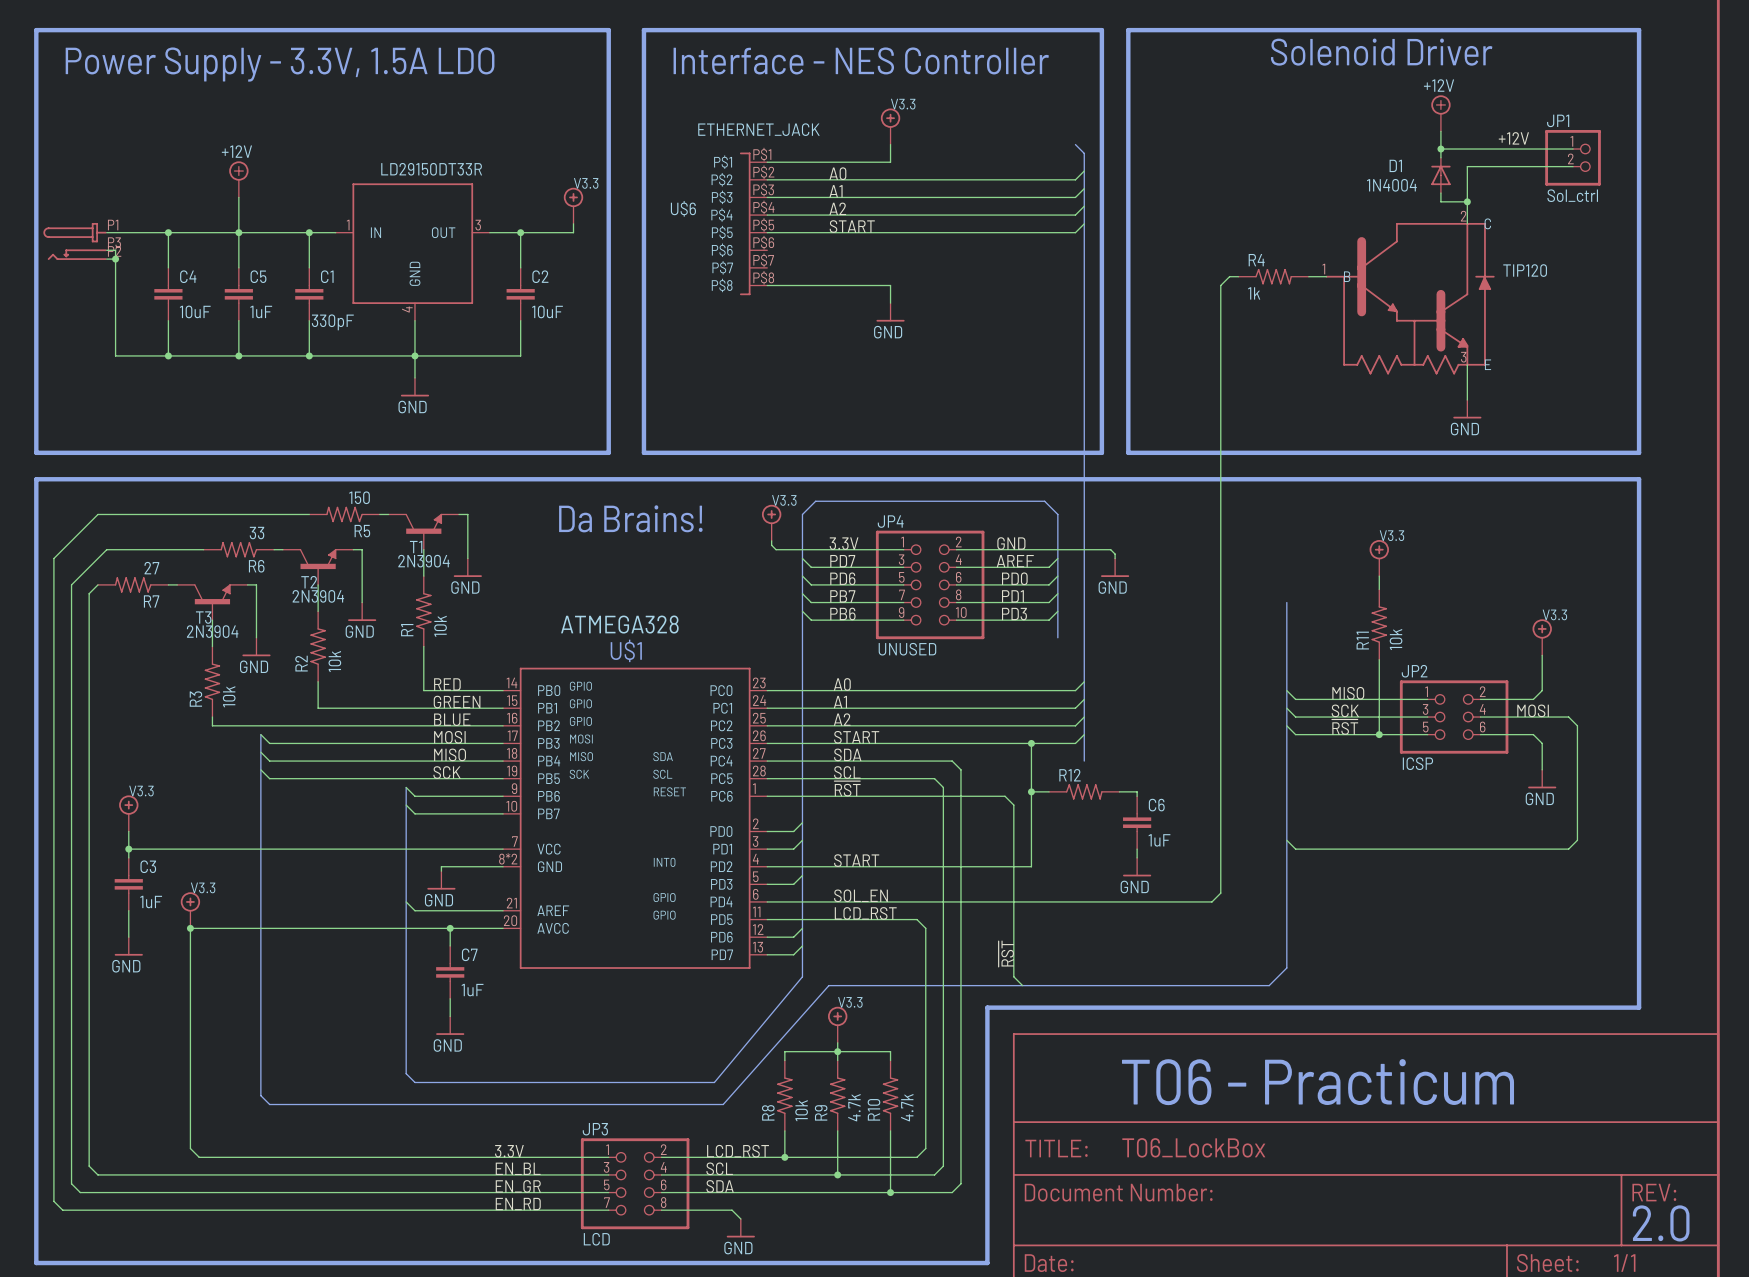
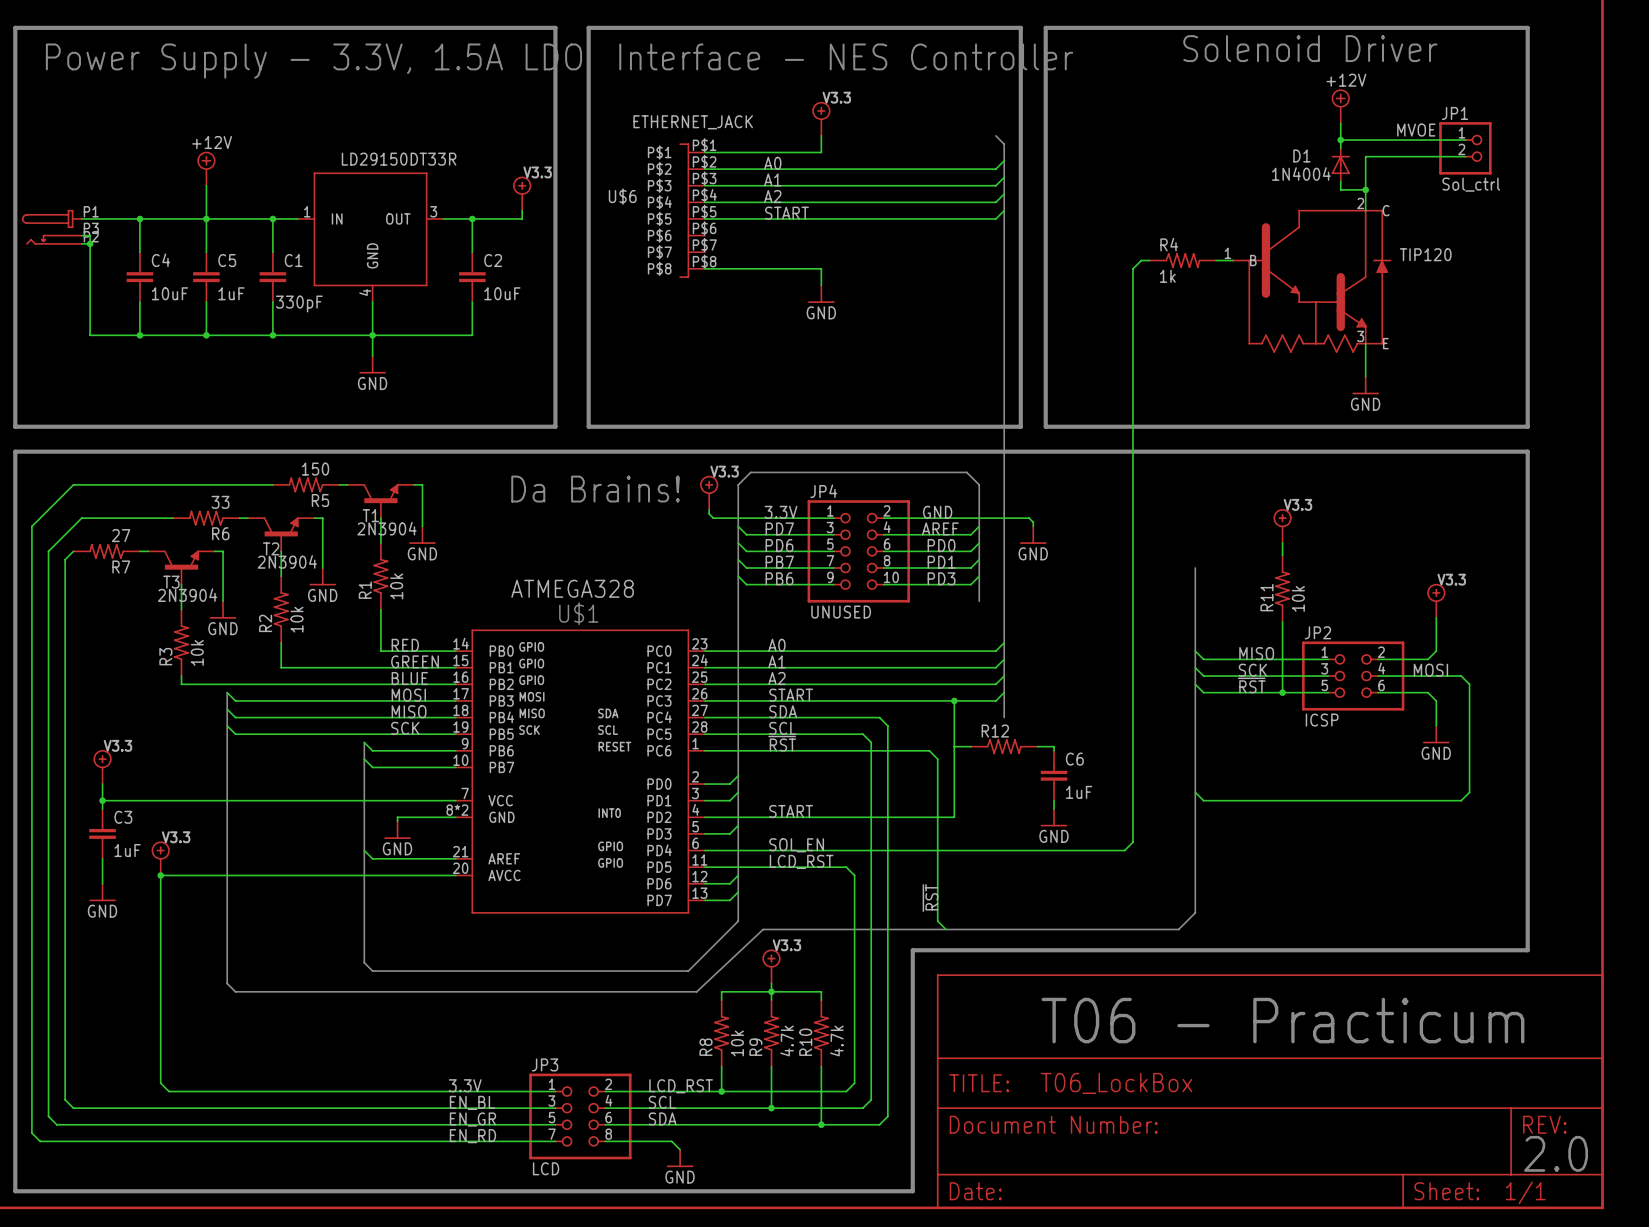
label: +12V (1513, 138) -> MVOE (1416, 130)
junction: (1031, 791) -> none
wire: (450, 928) (450, 945) -> none
junction: (450, 928) -> none
C7: 1uF (450, 972) -> none
bus: (802, 976) (714, 1082) (414, 1082) (406, 1073) (406, 1020) -> (738, 921) (688, 971) (372, 971) (364, 962)
bus: (828, 985) (723, 1104) (269, 1104) (260, 1095) (260, 1042) -> (763, 929) (696, 991) (235, 991) (227, 983)
wire: (450, 998) (450, 1016) -> none
power symbol: GND (450, 1025) -> none

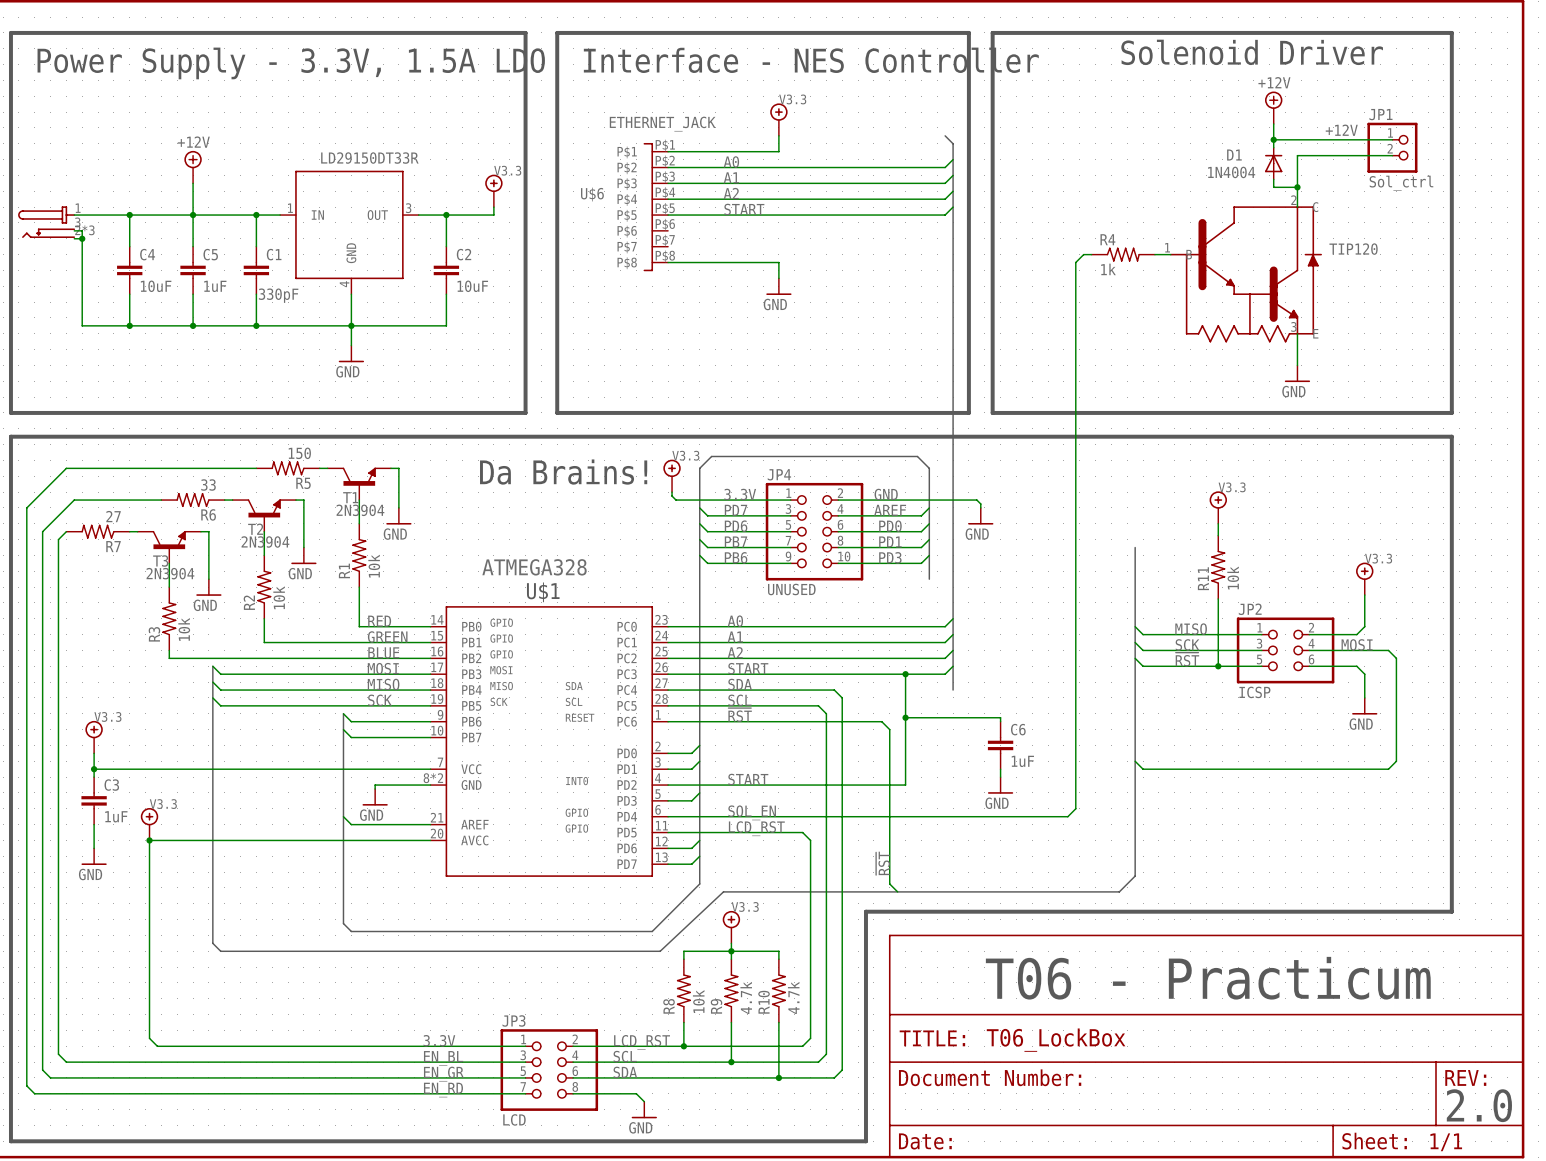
label: MVOE (1416, 130) -> +12V (1341, 130)
part symbol: [21, 209, 82, 245] -> [18, 206, 76, 238]
junction: none -> (905, 717)
R12: (1004, 746) -> none

